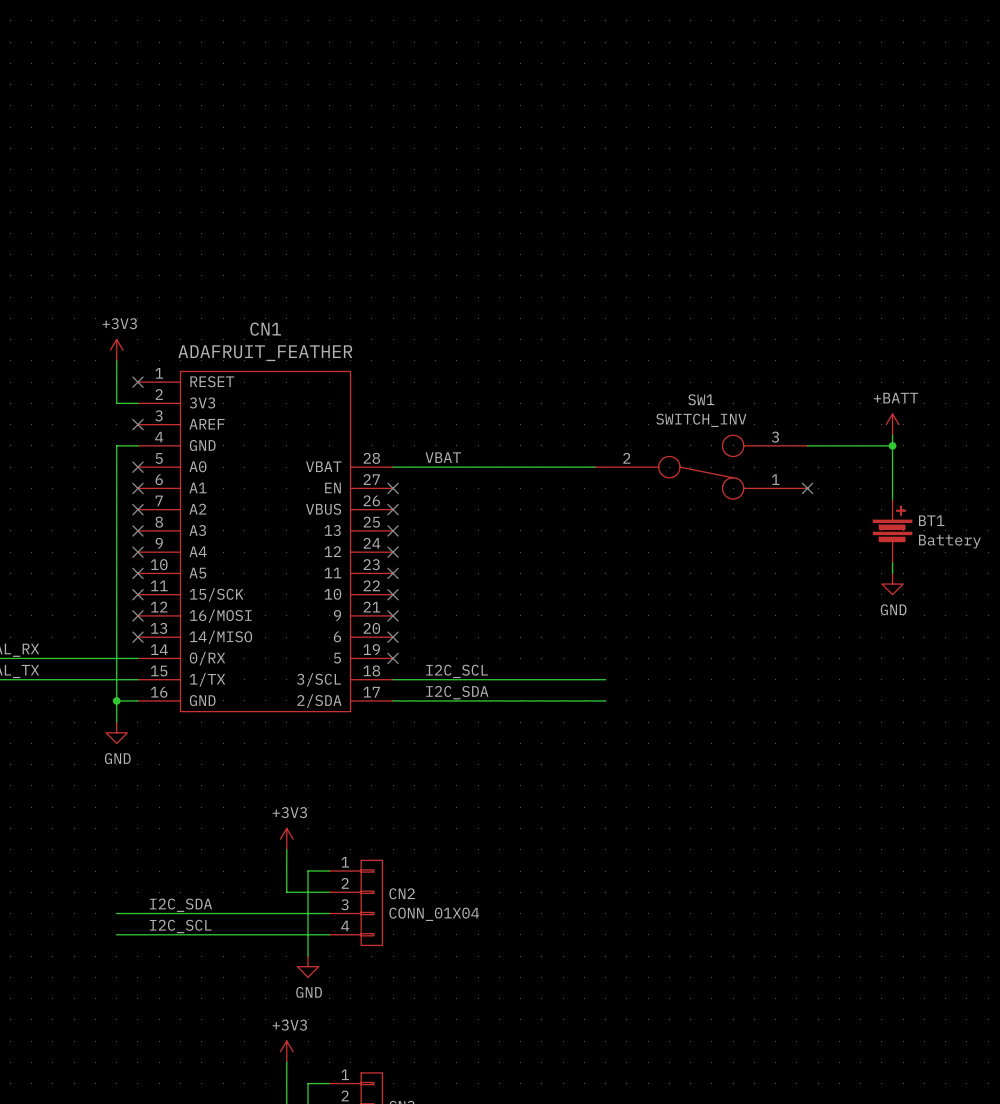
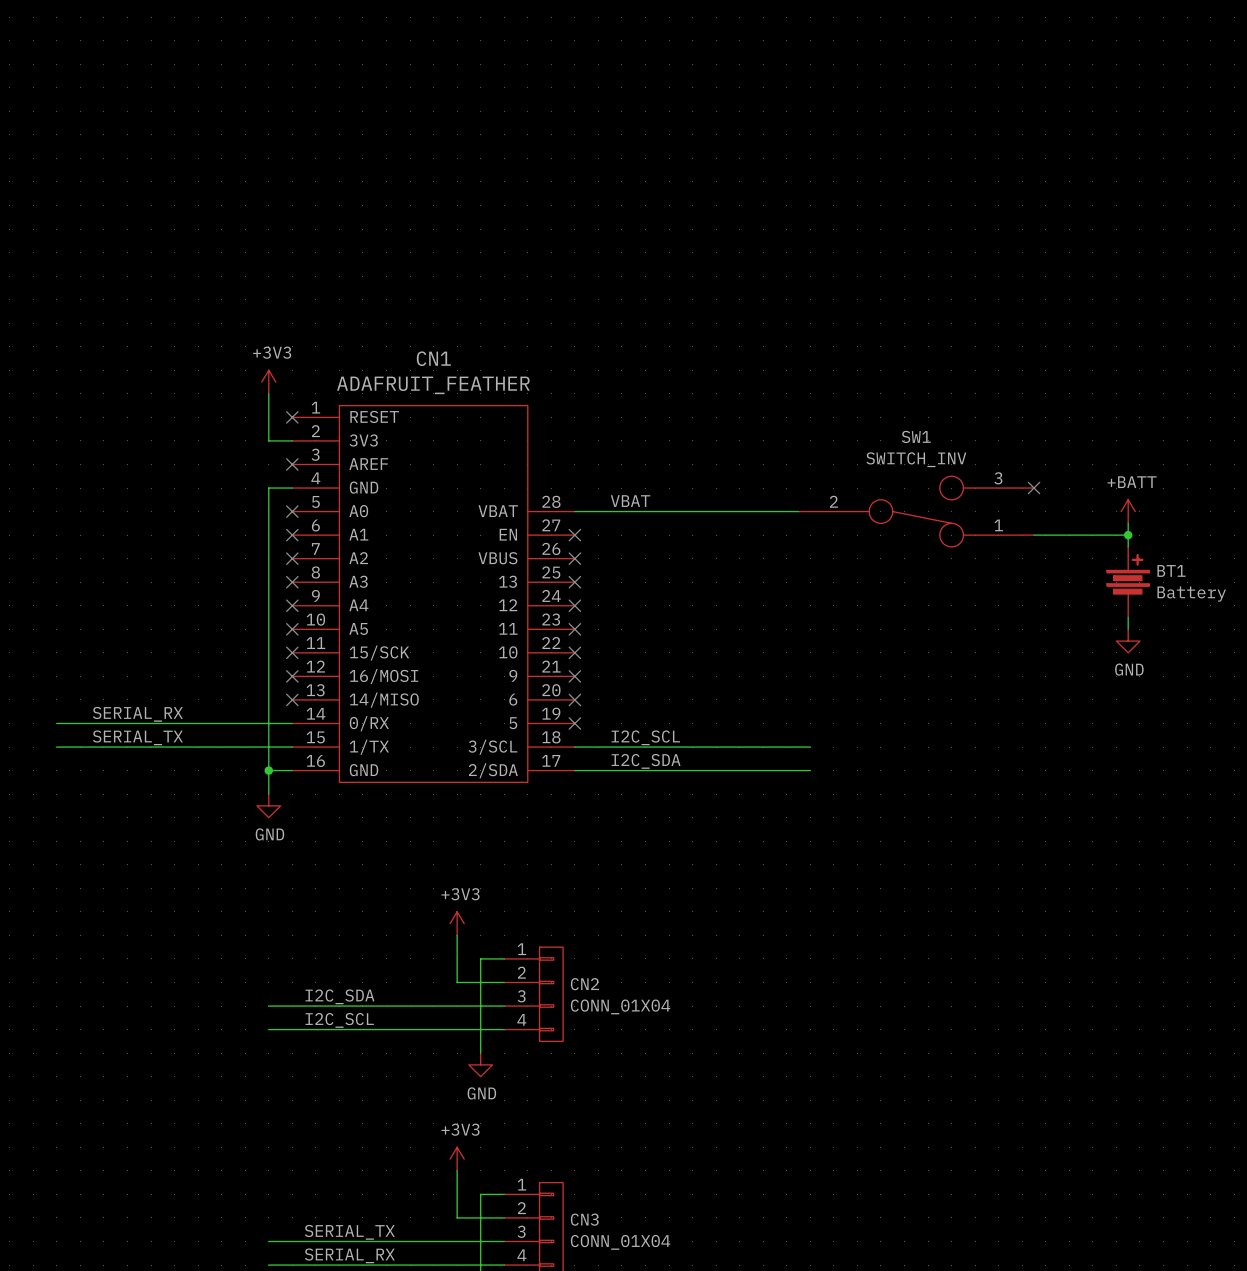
power symbol position: +BATT (892, 424) -> +BATT (1128, 511)
wire: (807, 445) (892, 445) -> (1034, 535) (1128, 535)
junction position: (892, 445) -> (1128, 535)
no-connect mark position: (807, 488) -> (1034, 488)

